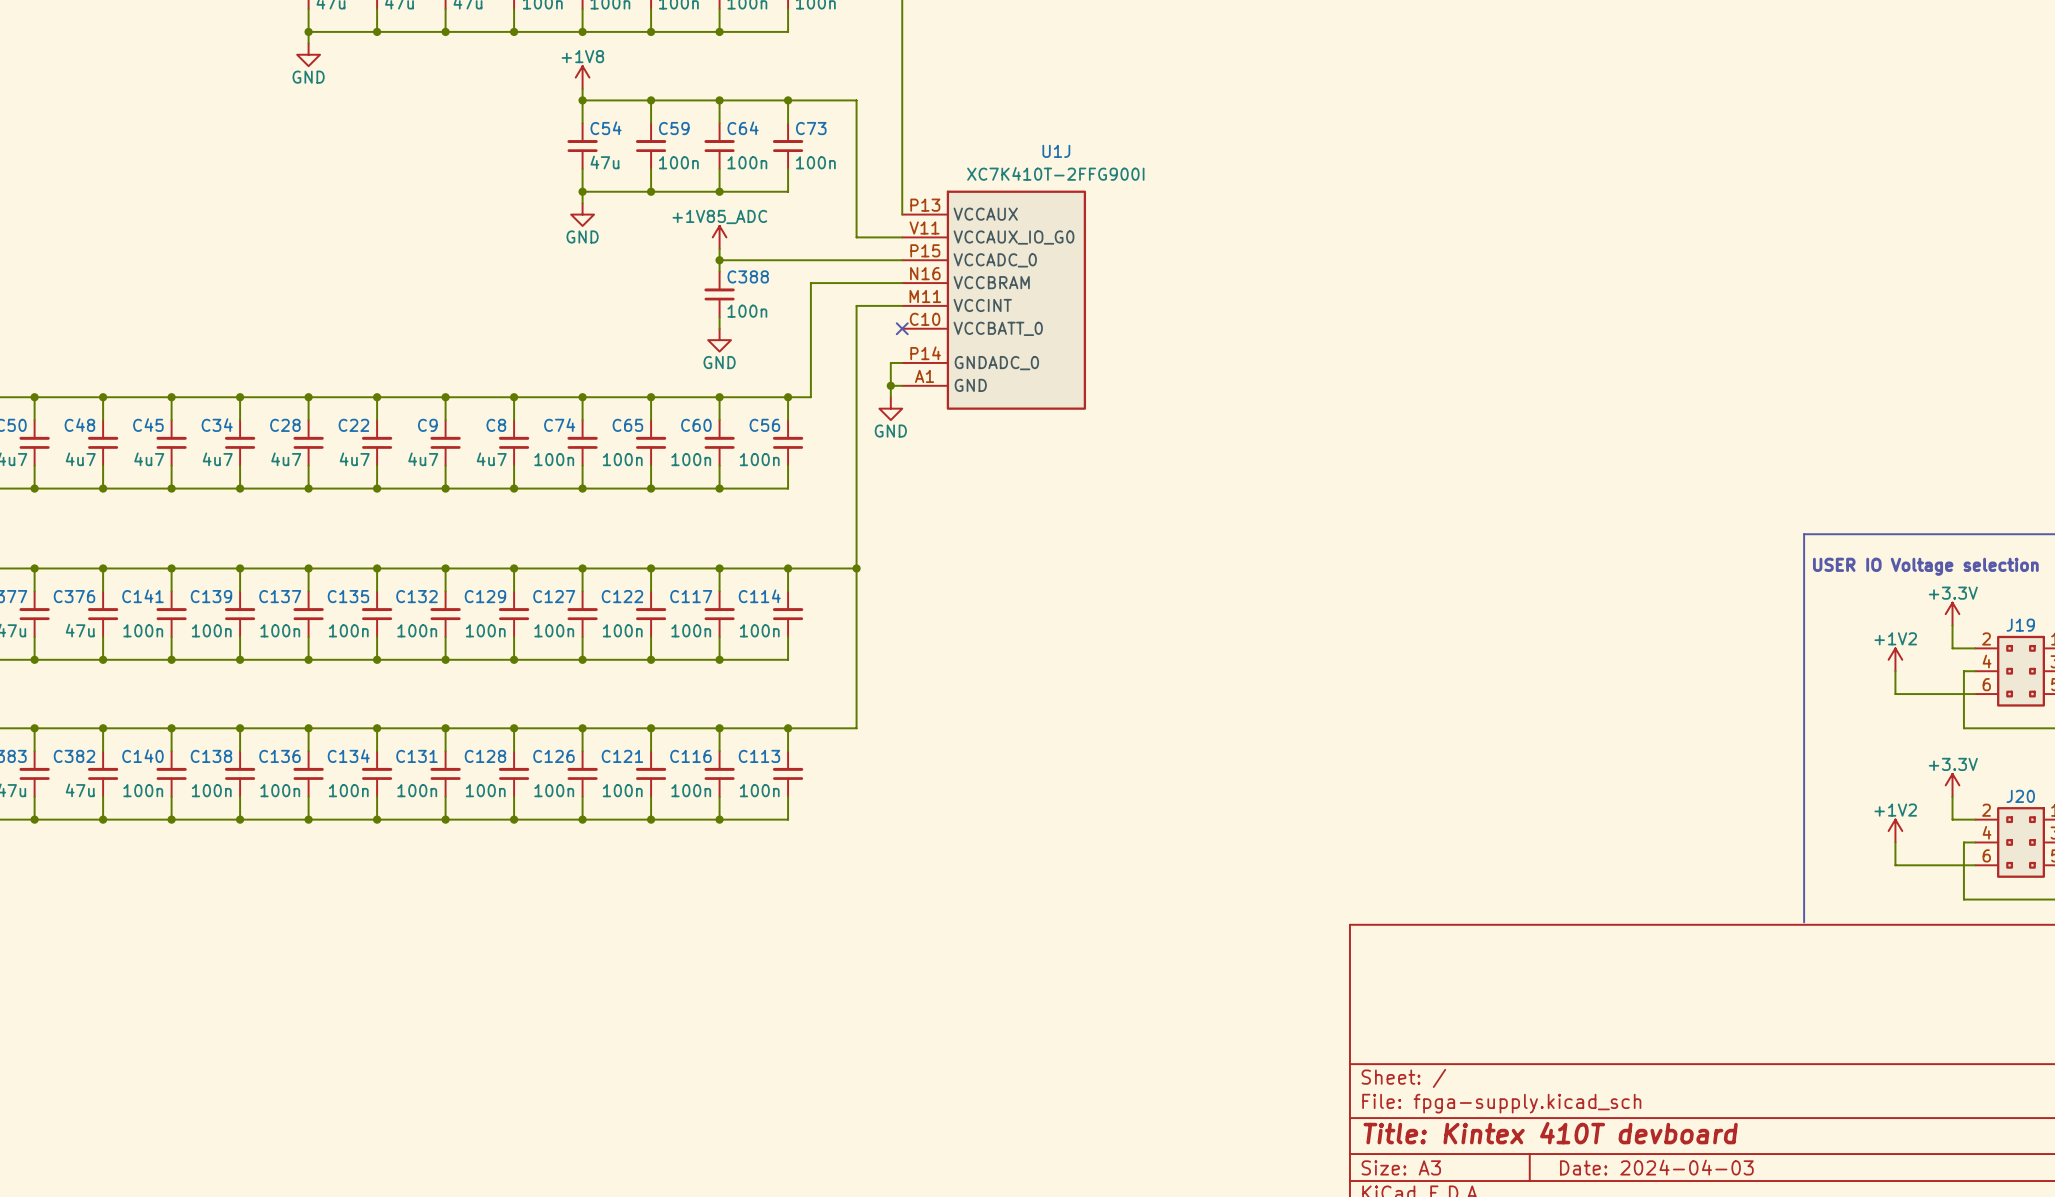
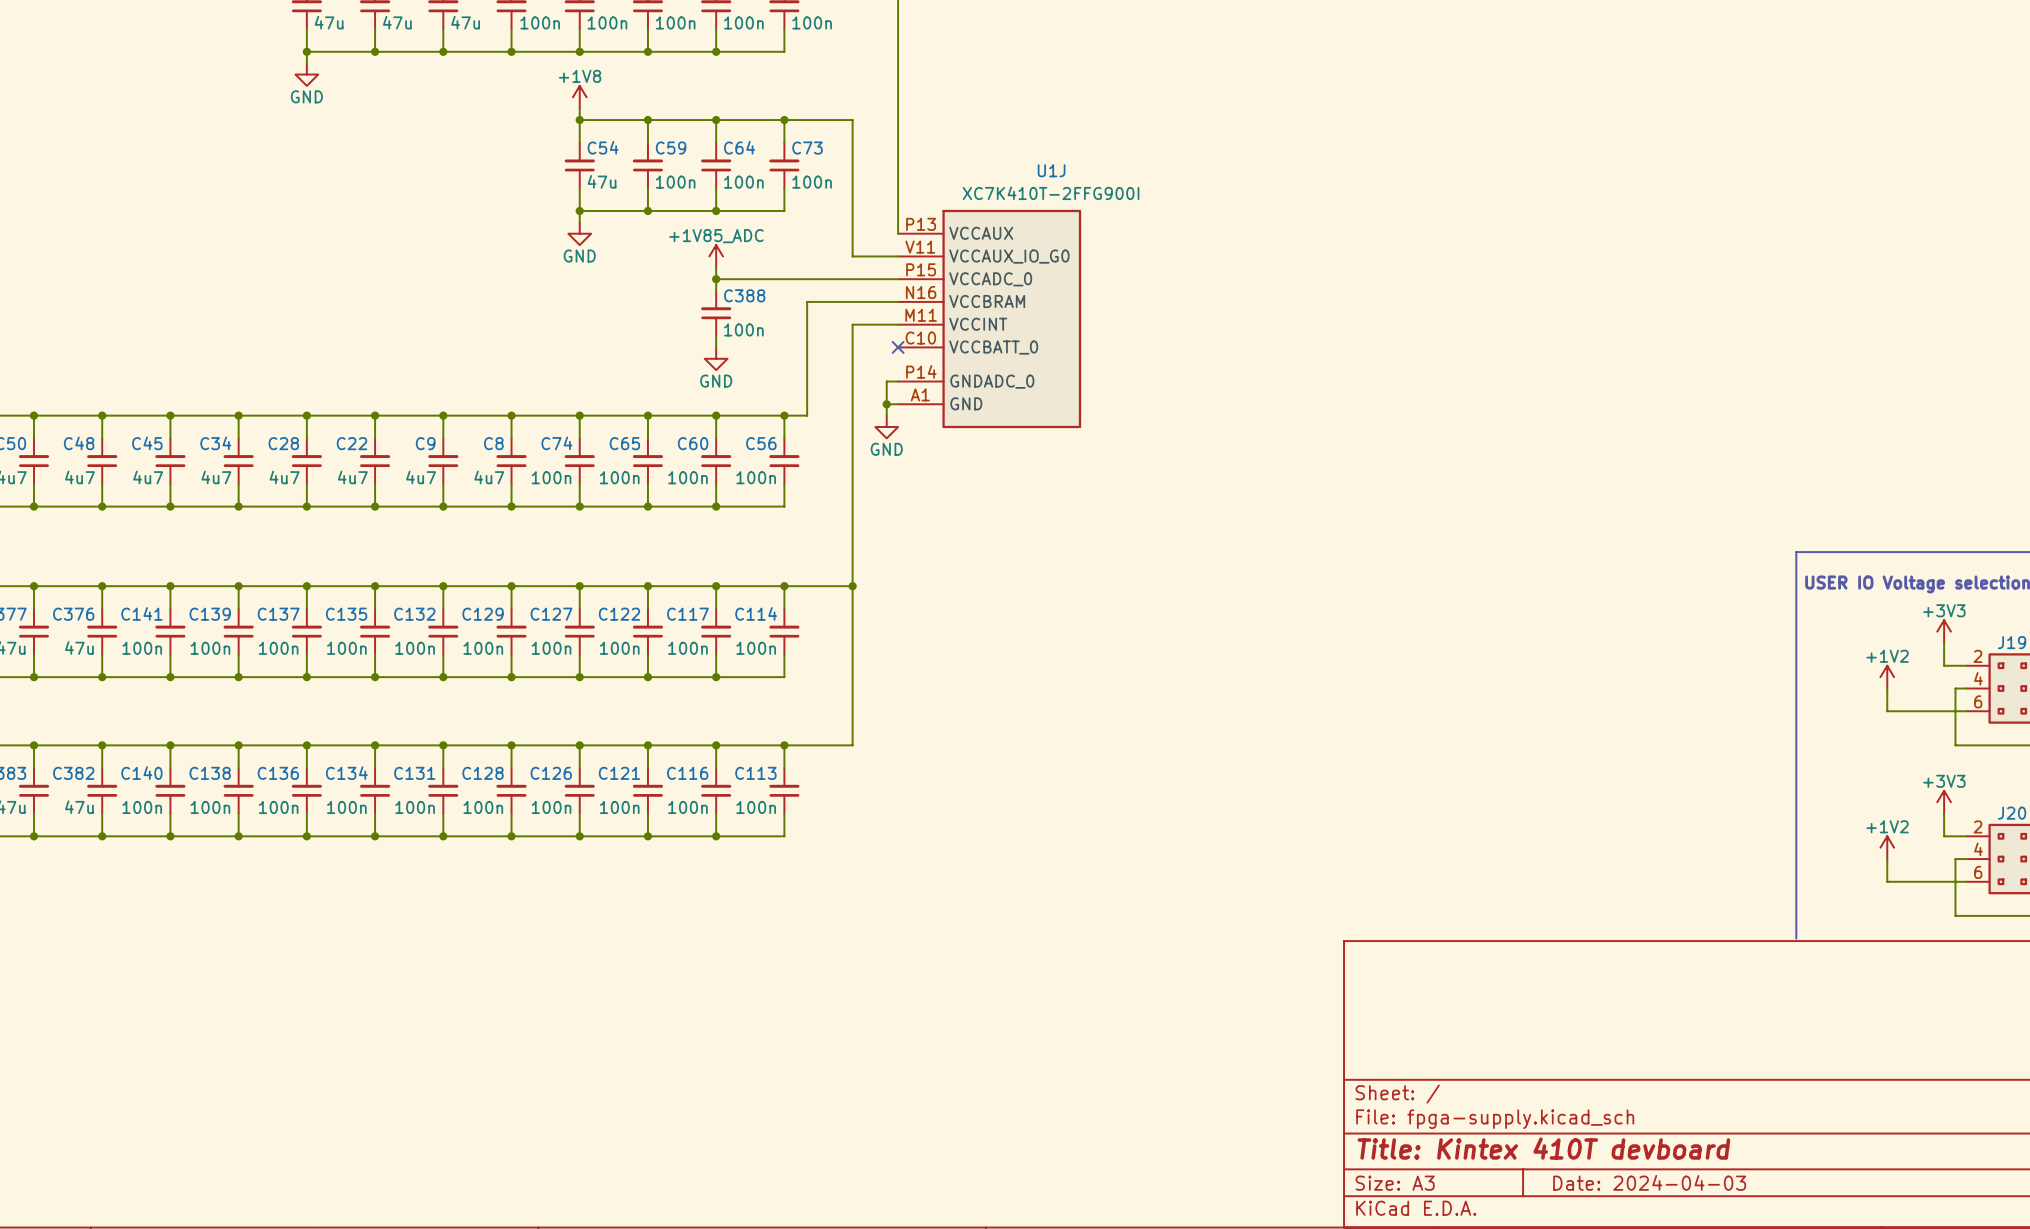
power symbol: +3.3V (1952, 614) -> +3V3 (1944, 631)
power symbol: +3.3V (1952, 785) -> +3V3 (1944, 802)

